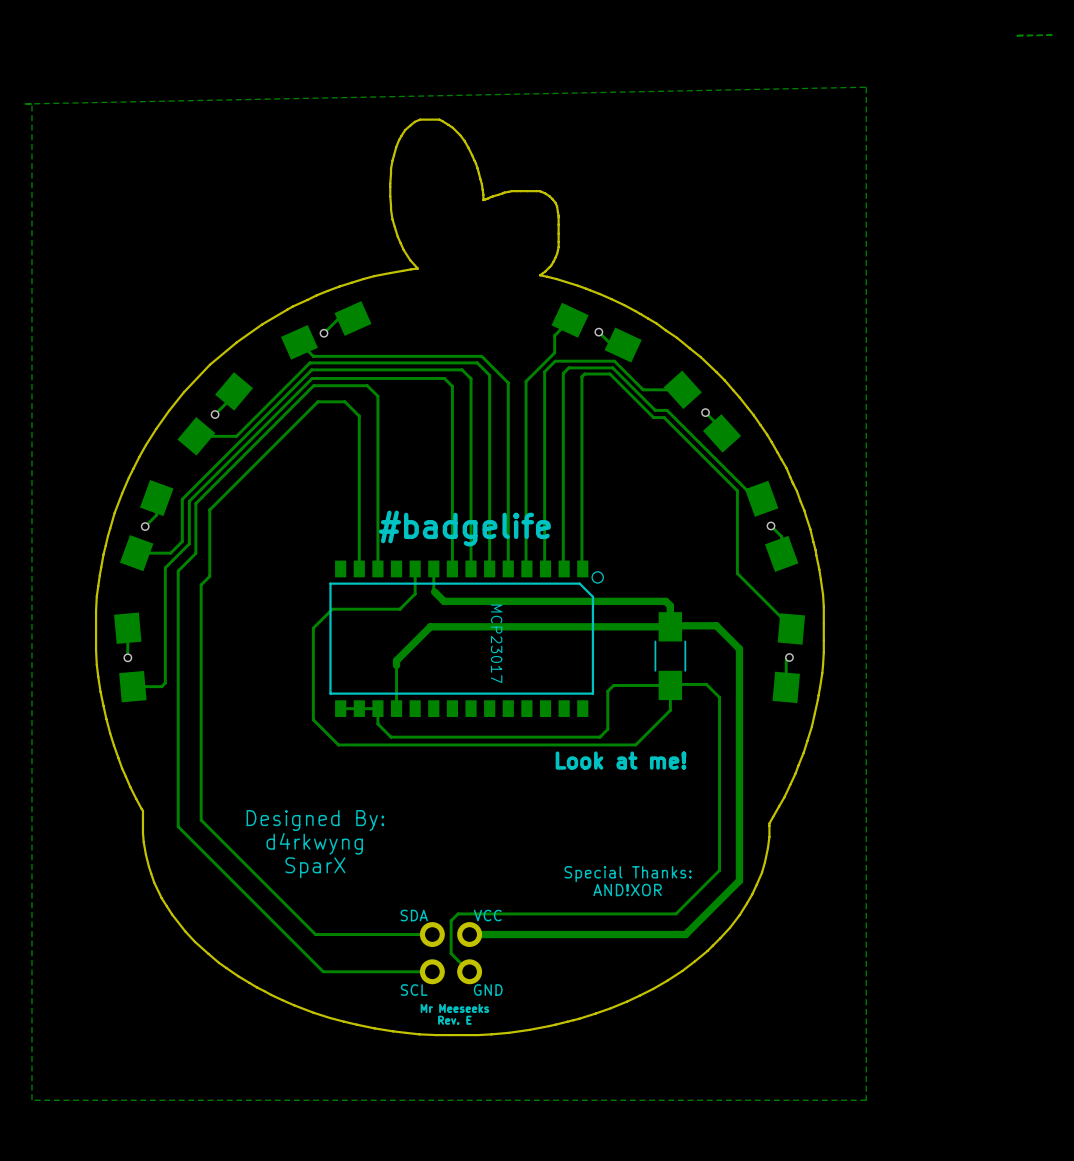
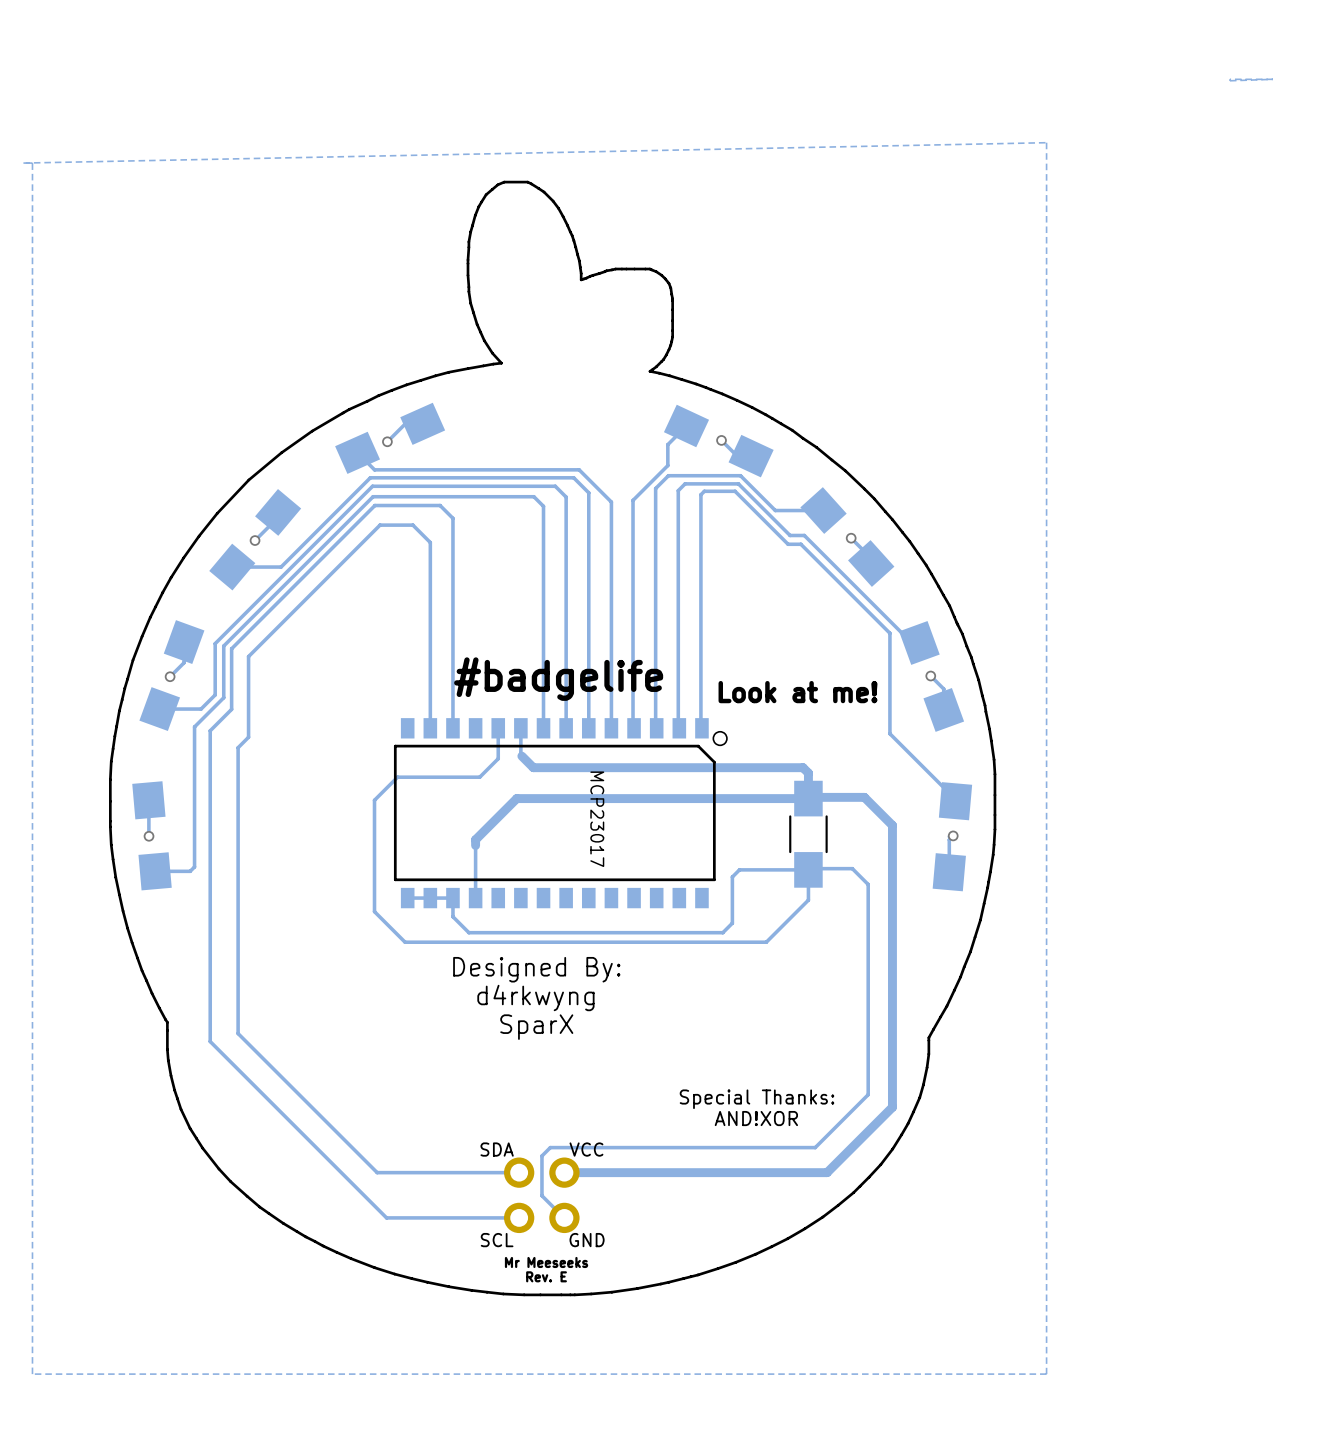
text position: Look at me! (621, 760) -> Look at me! (798, 692)
text position: Designed By: (315, 820) -> Designed By: (536, 969)
text position: d4rkwyng (314, 843) -> d4rkwyng (535, 998)
text position: SparX (315, 867) -> SparX (536, 1027)

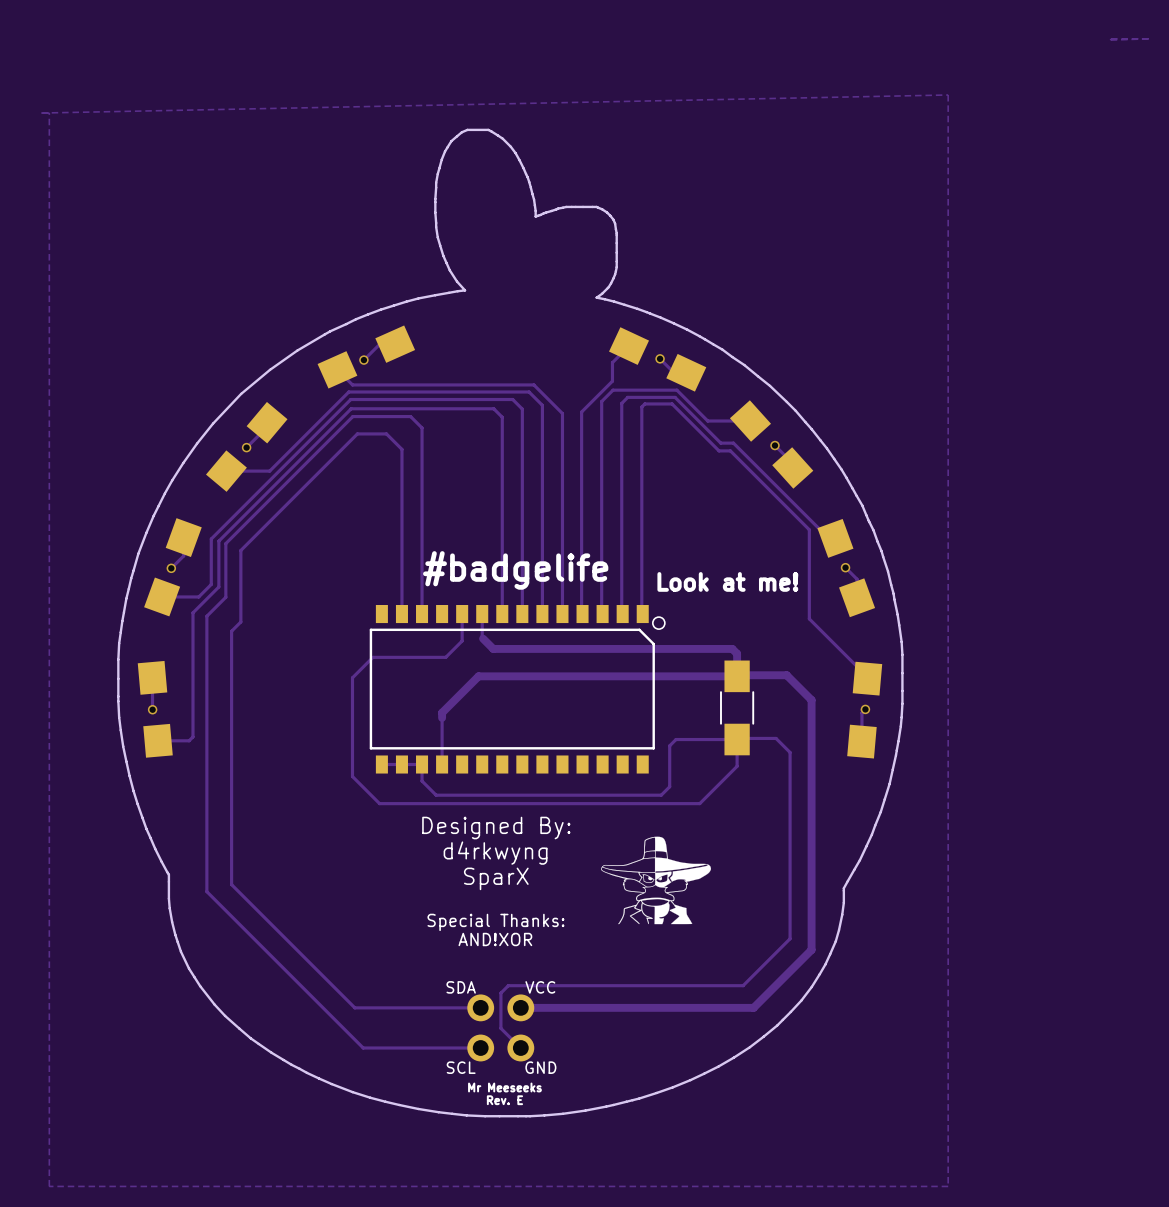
part value: MCP23017 (597, 819) -> none
drawing: none -> [601, 836, 711, 925]
text position: Special Thanks: (757, 1099) -> Special Thanks: (495, 922)
text position: AND!XOR (756, 1118) -> AND!XOR (495, 939)

